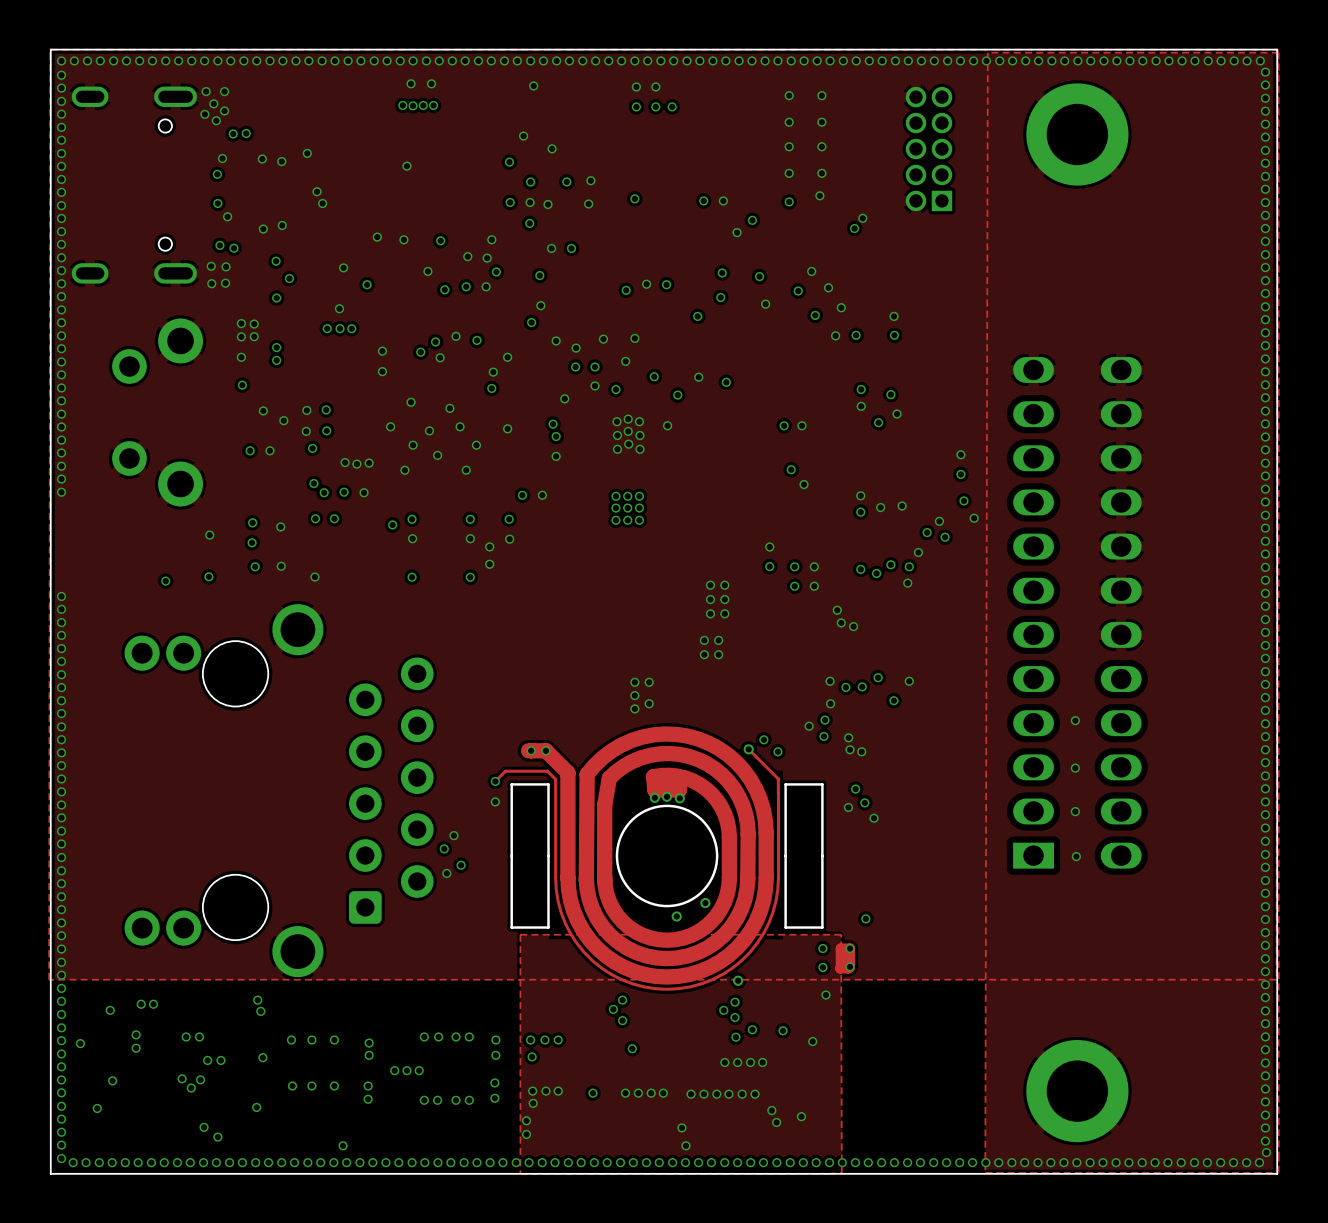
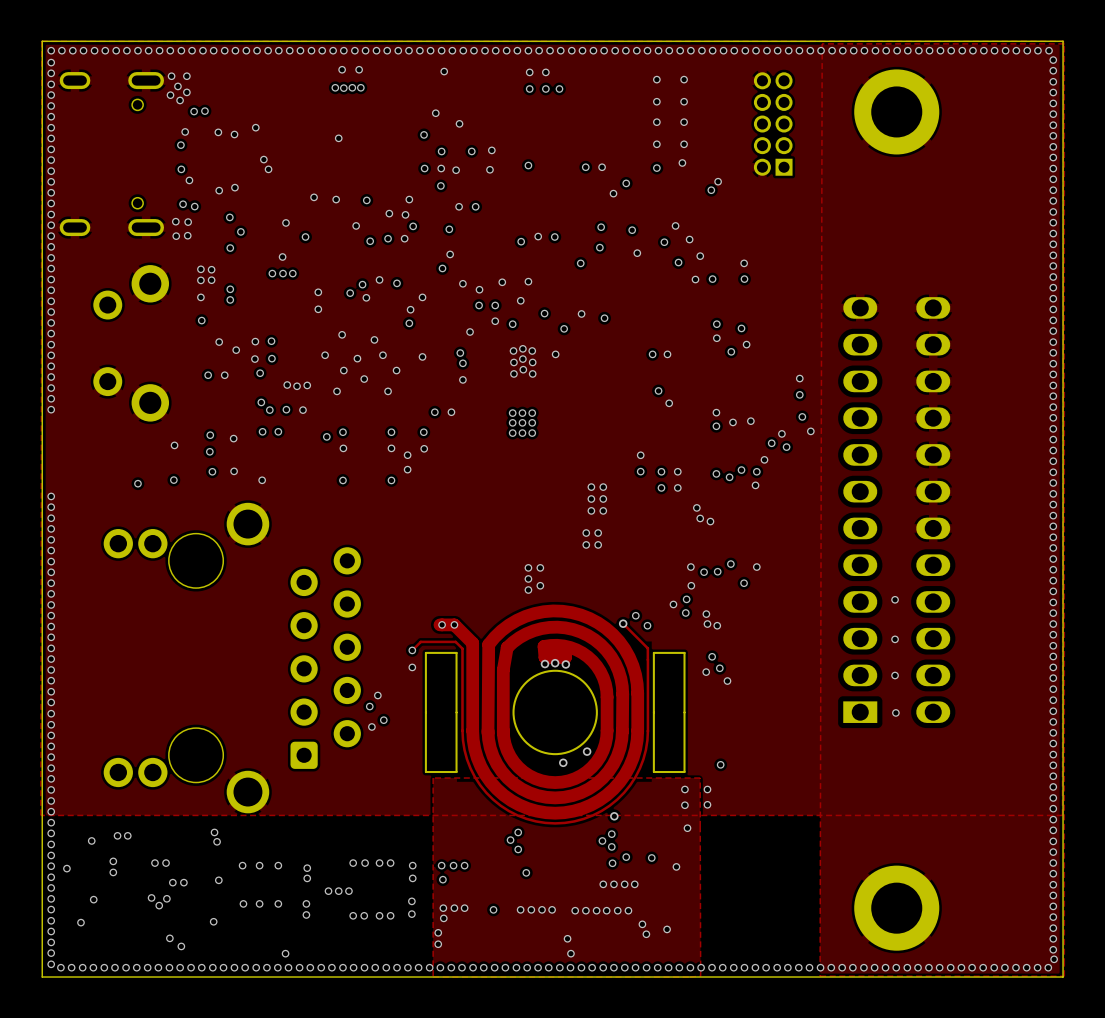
track: (840, 948) (840, 968) (848, 968) (850, 948) (840, 948) -> none

